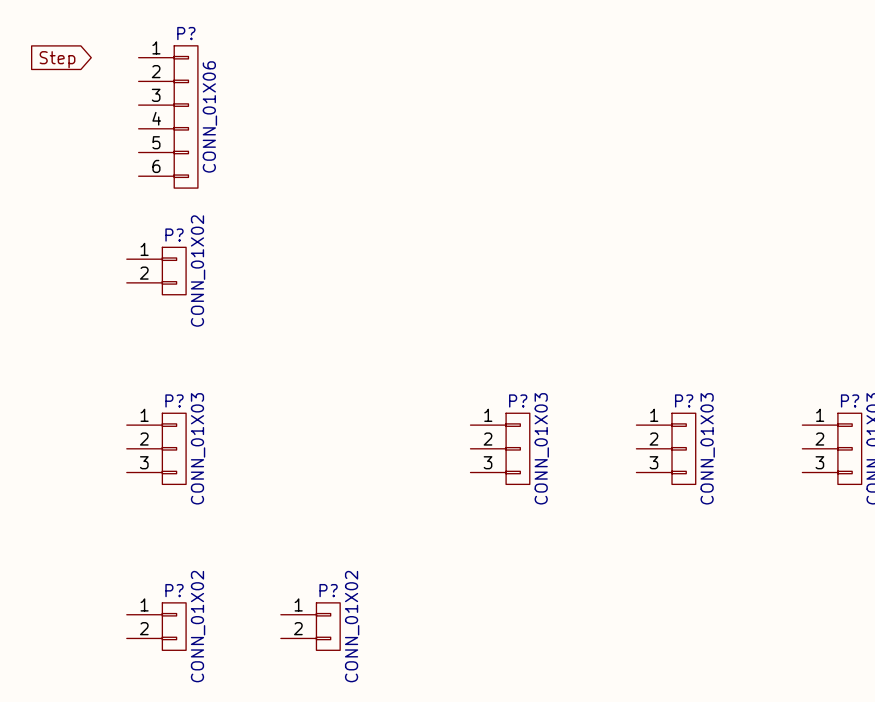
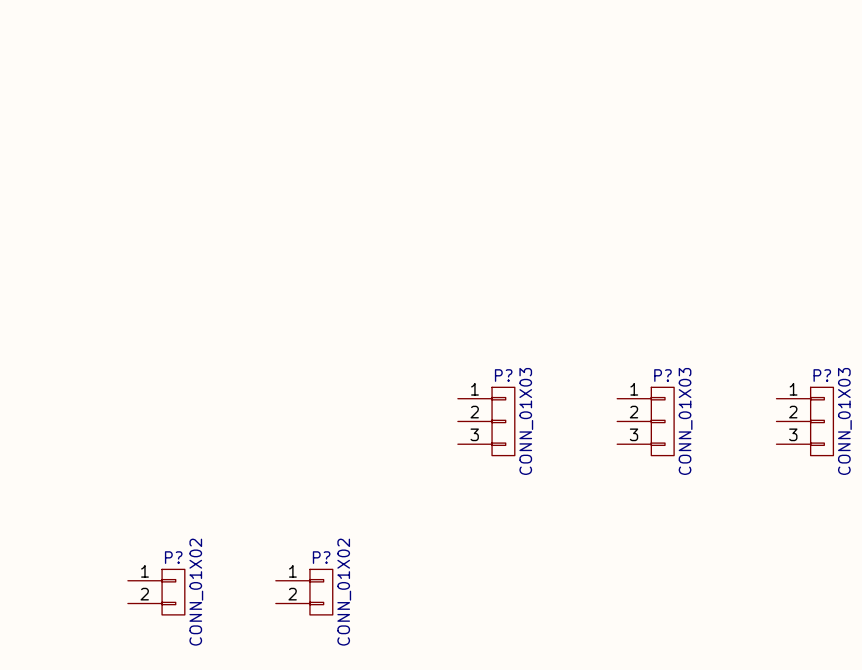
global label: Step (57, 59) -> none
P?: CONN_01X06 (168, 116) -> none
P?: CONN_01X02 (156, 271) -> none
P?: CONN_01X03 (156, 448) -> none

